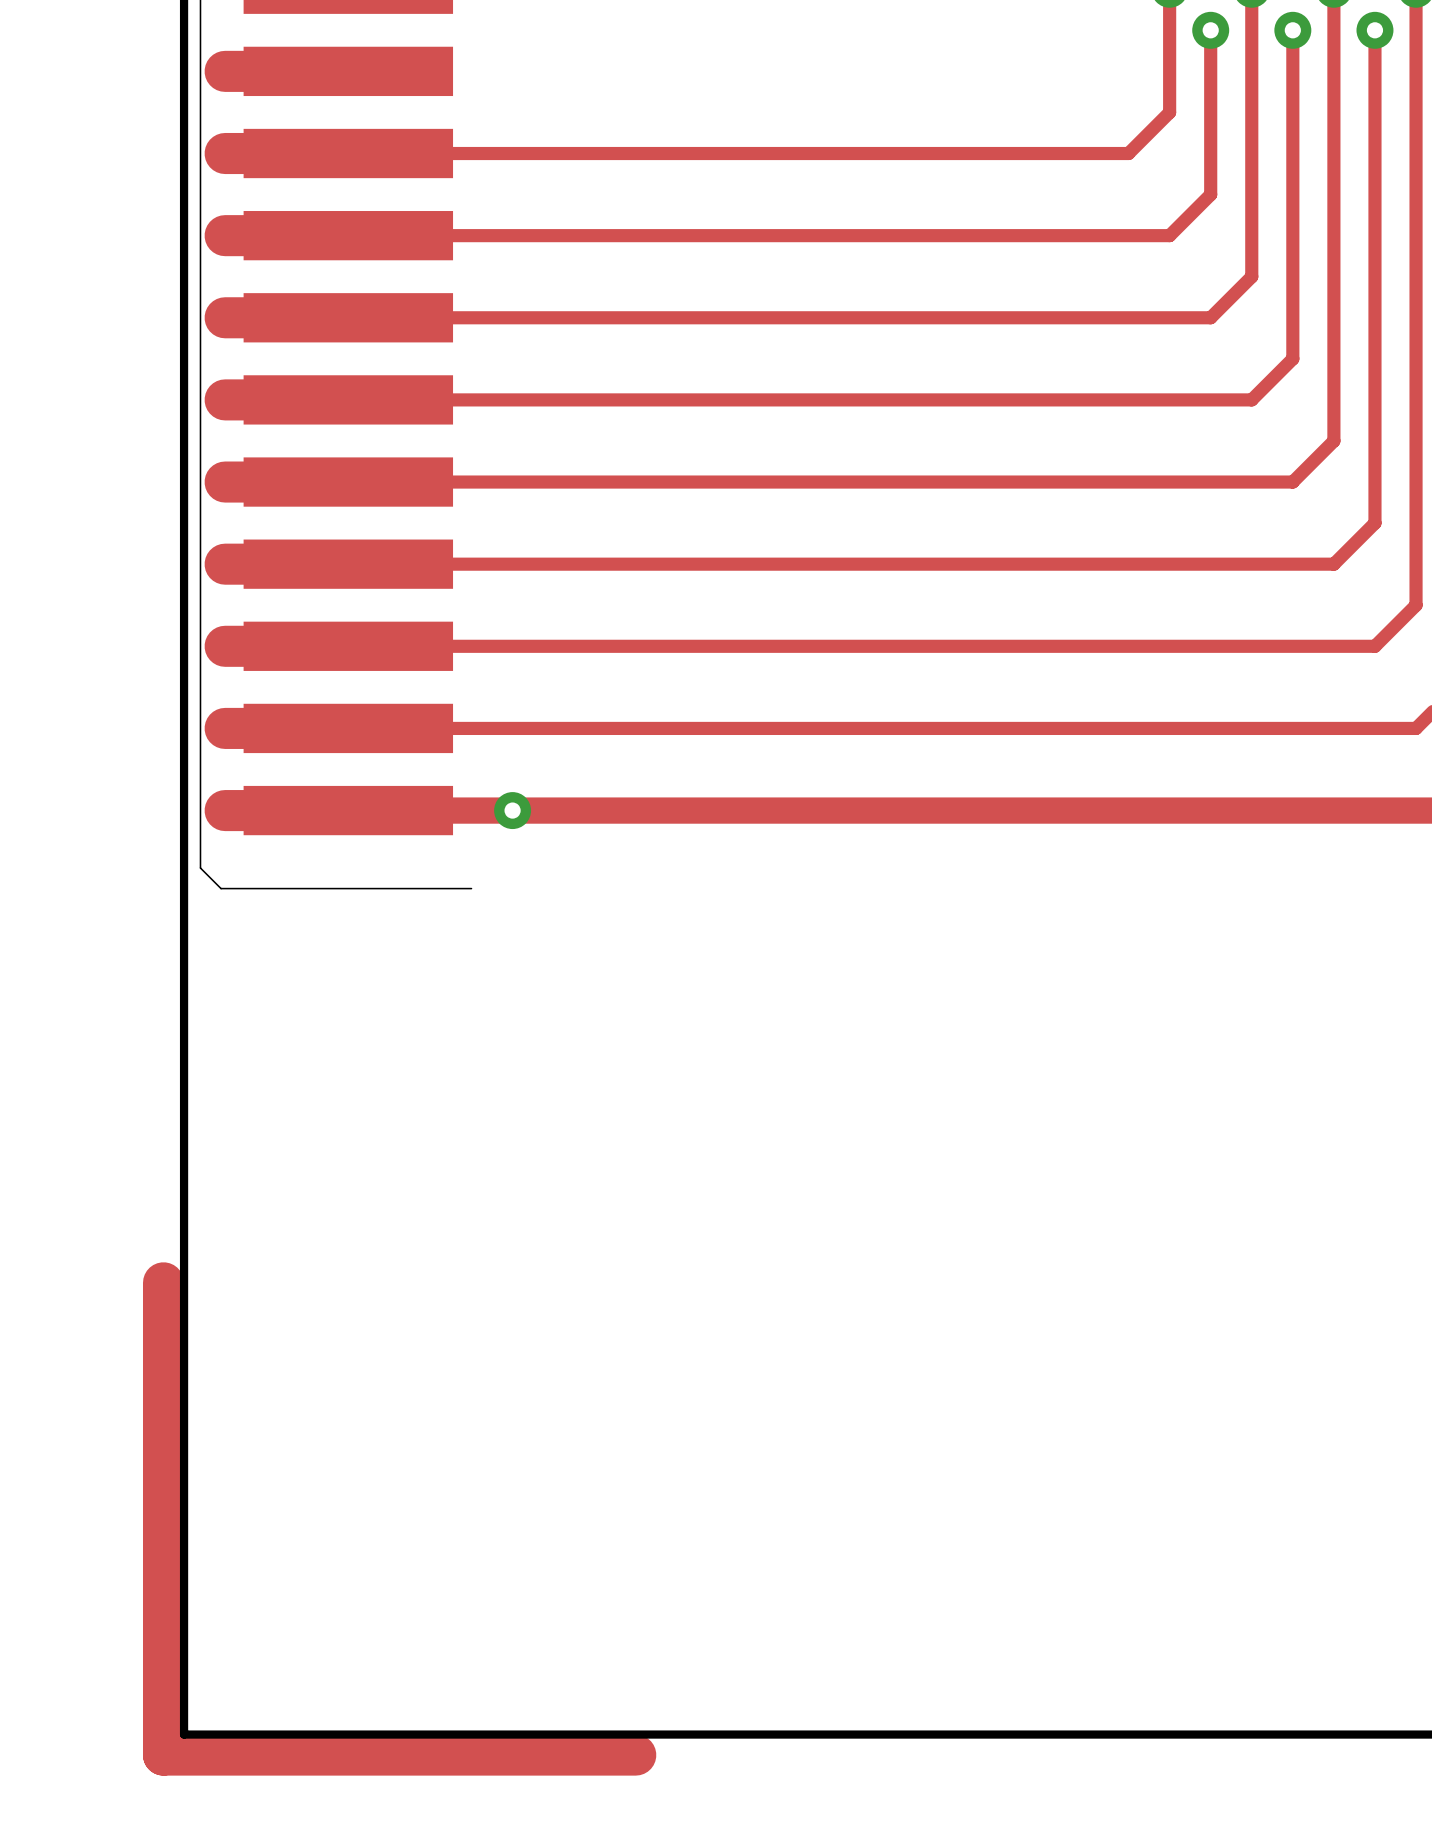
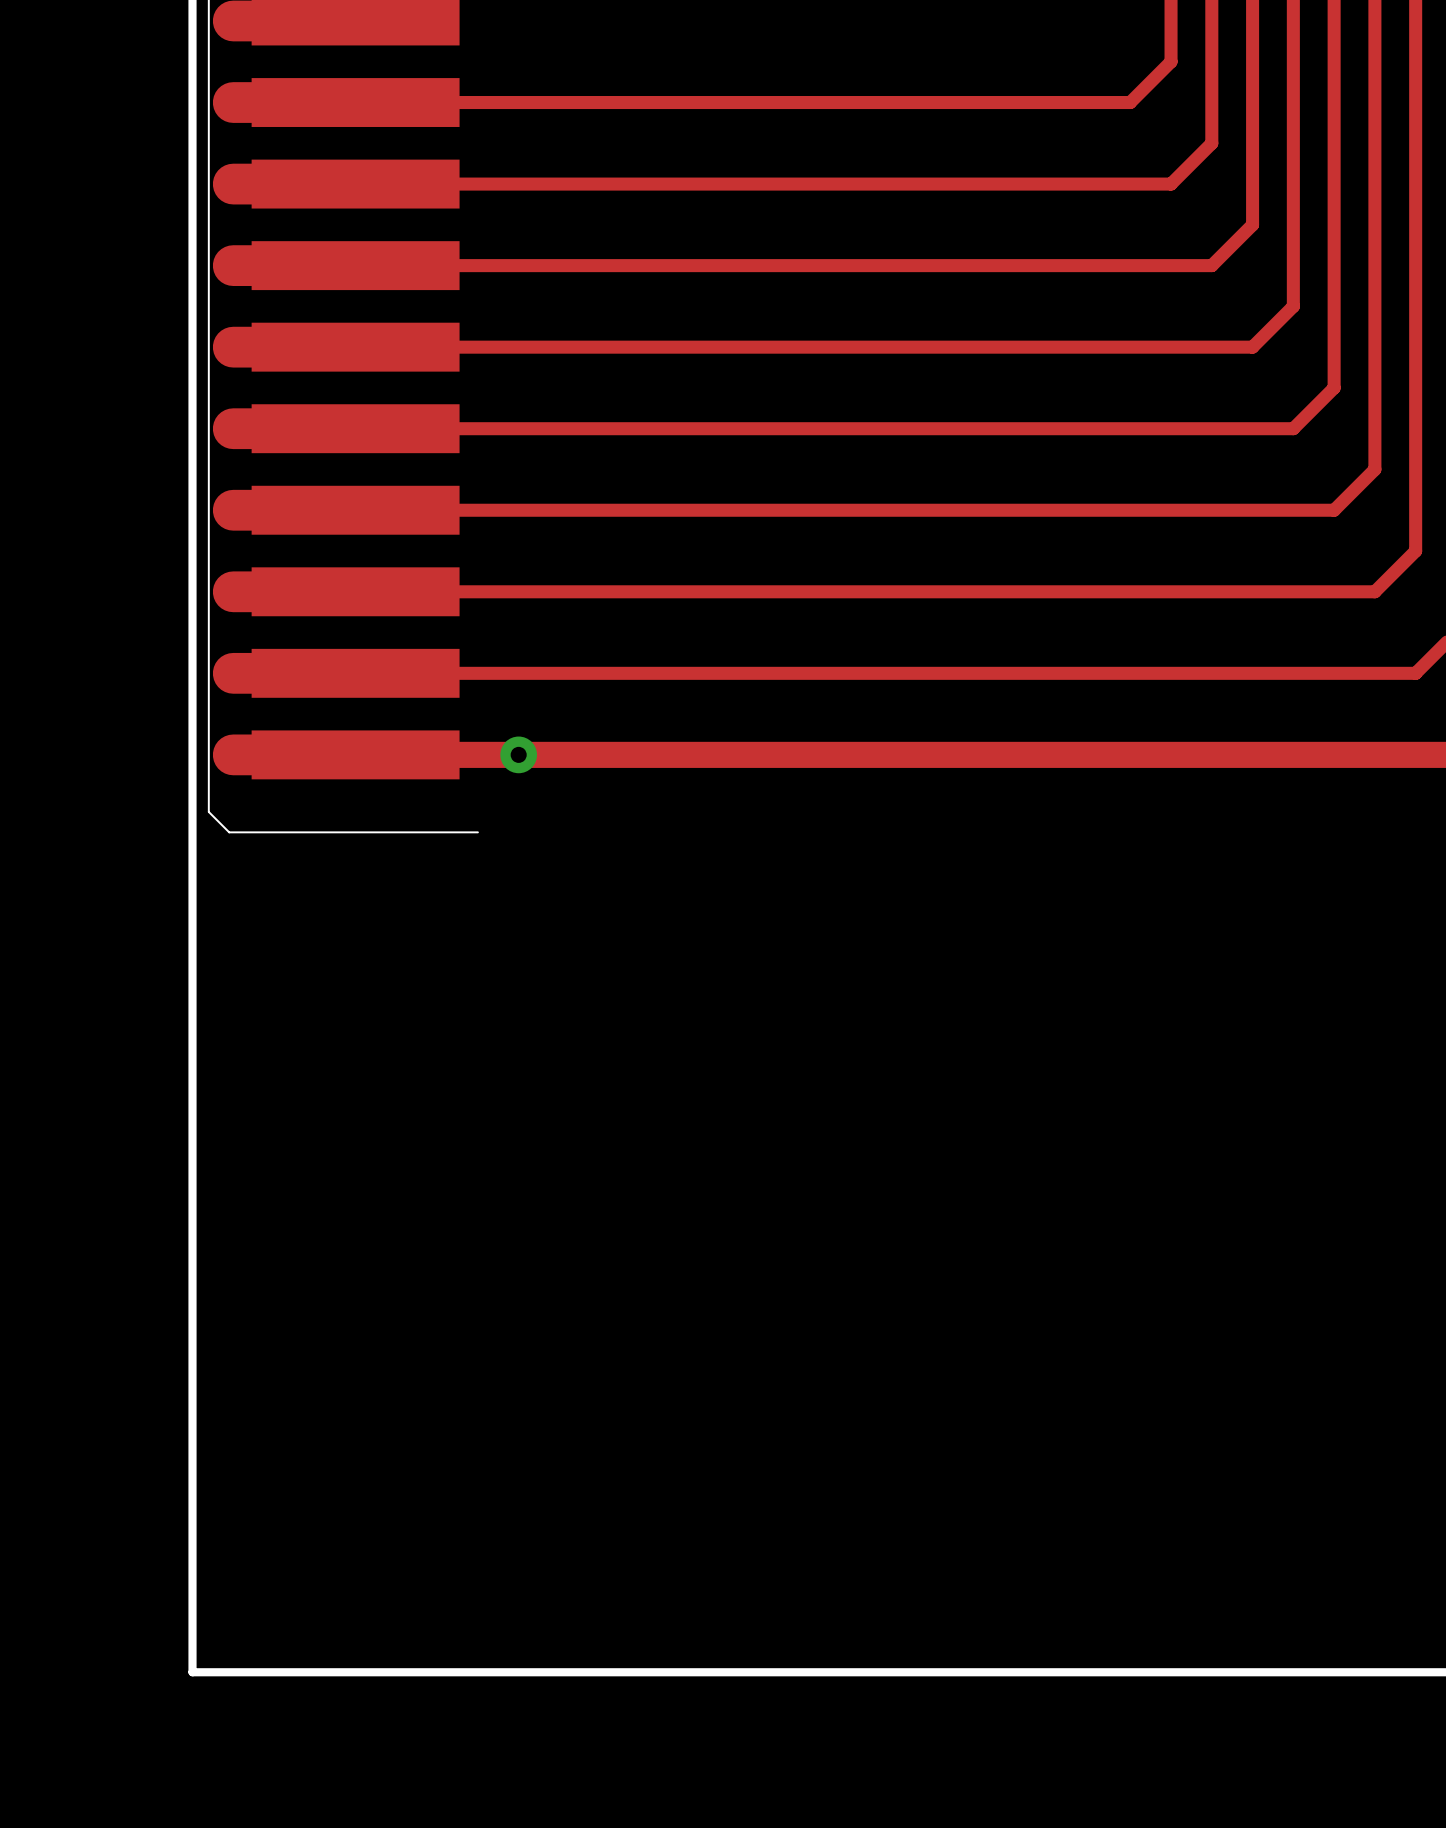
track: (163, 1282) (163, 1755) (635, 1755) -> none

